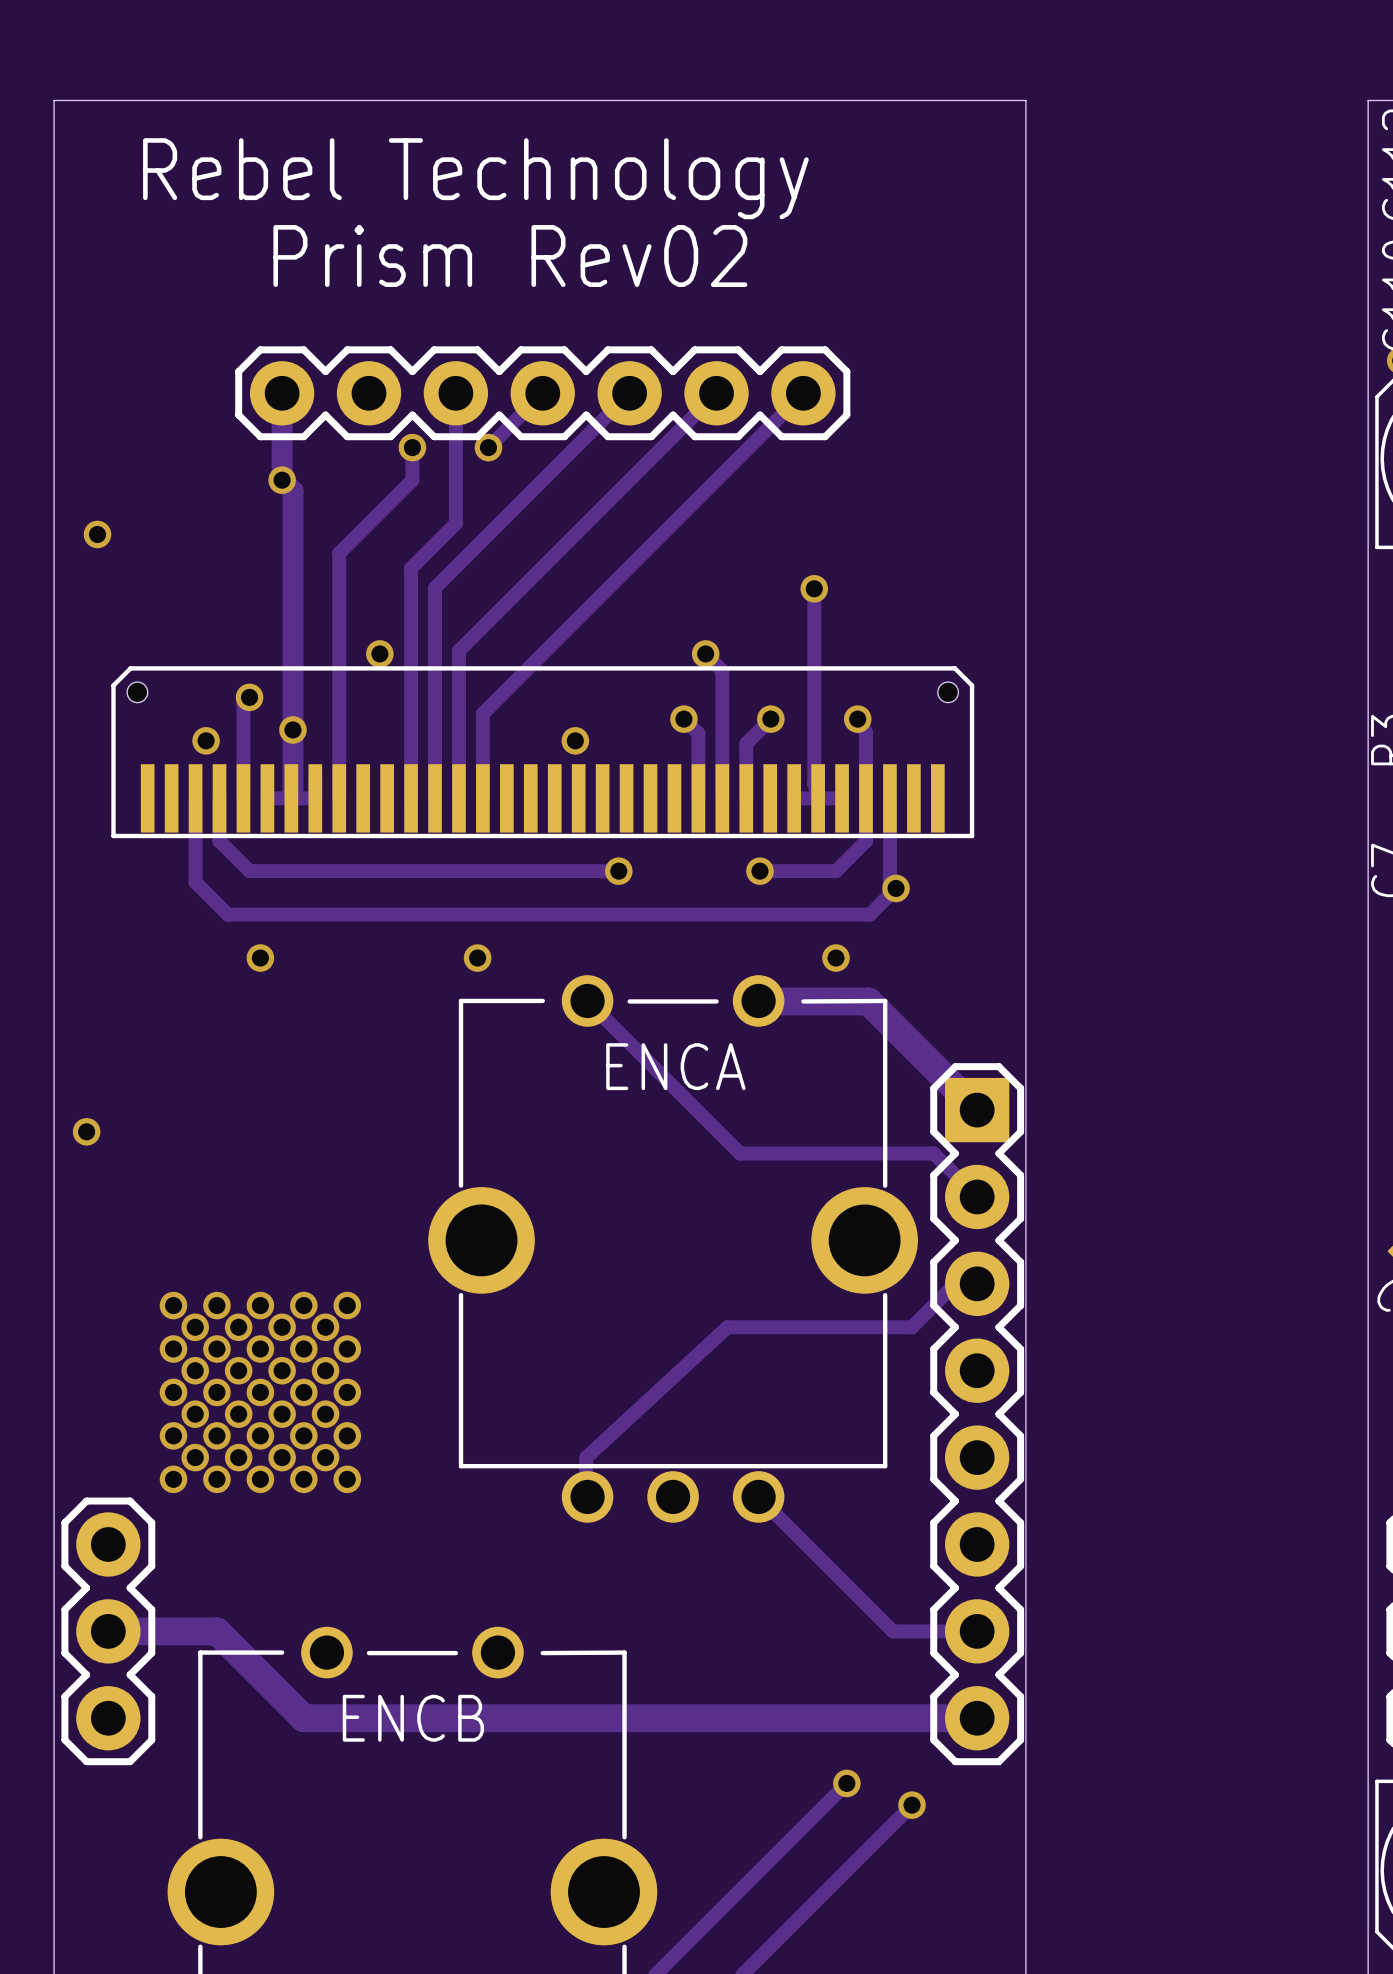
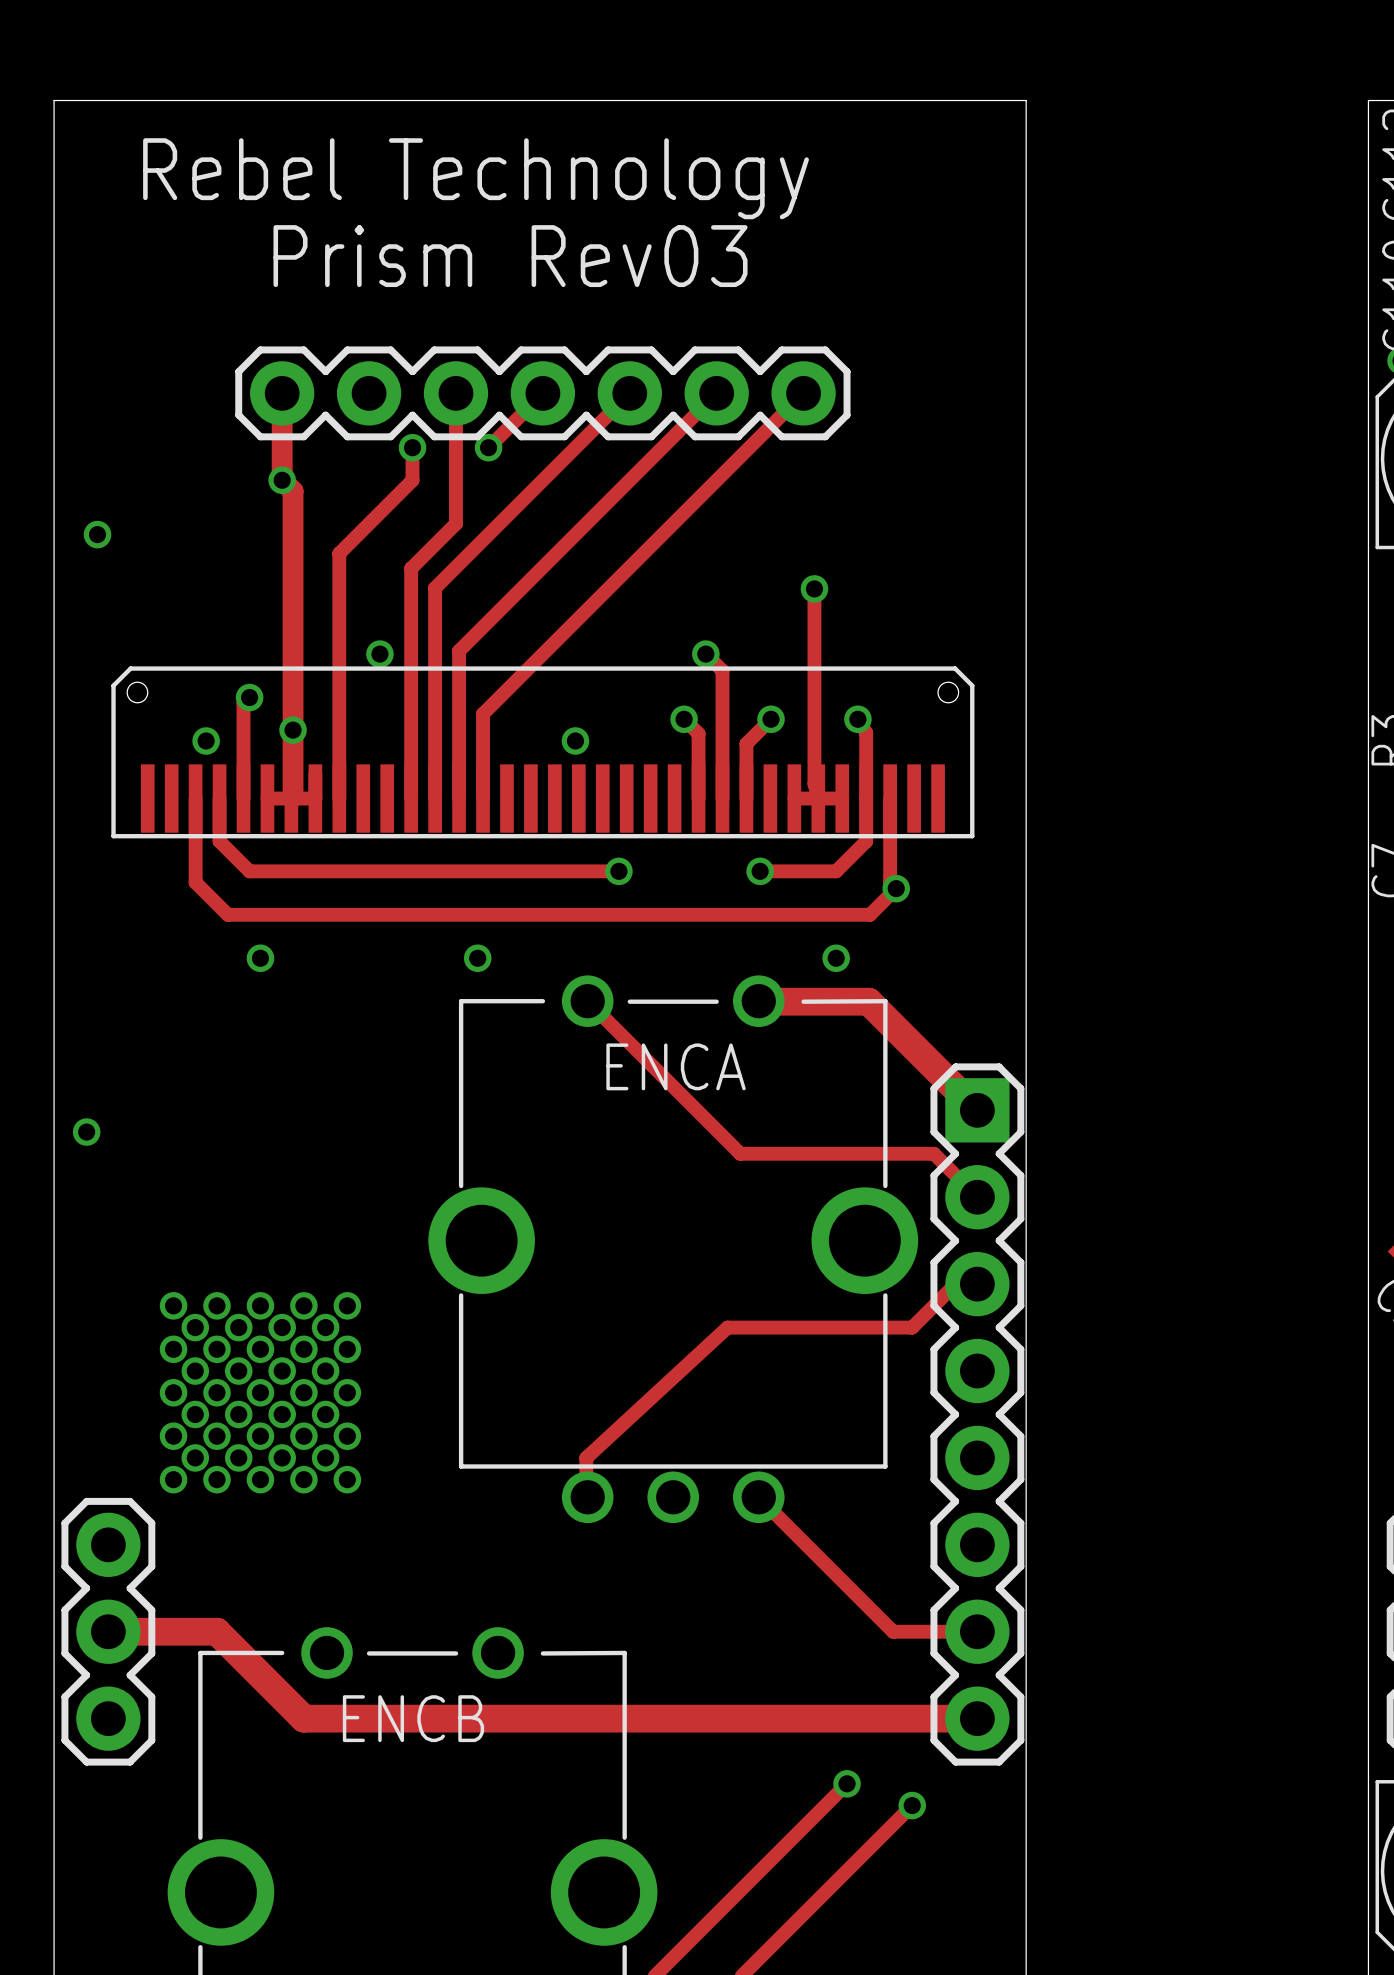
text: Prism Rev02 (510, 256) -> Prism Rev03 (510, 256)

